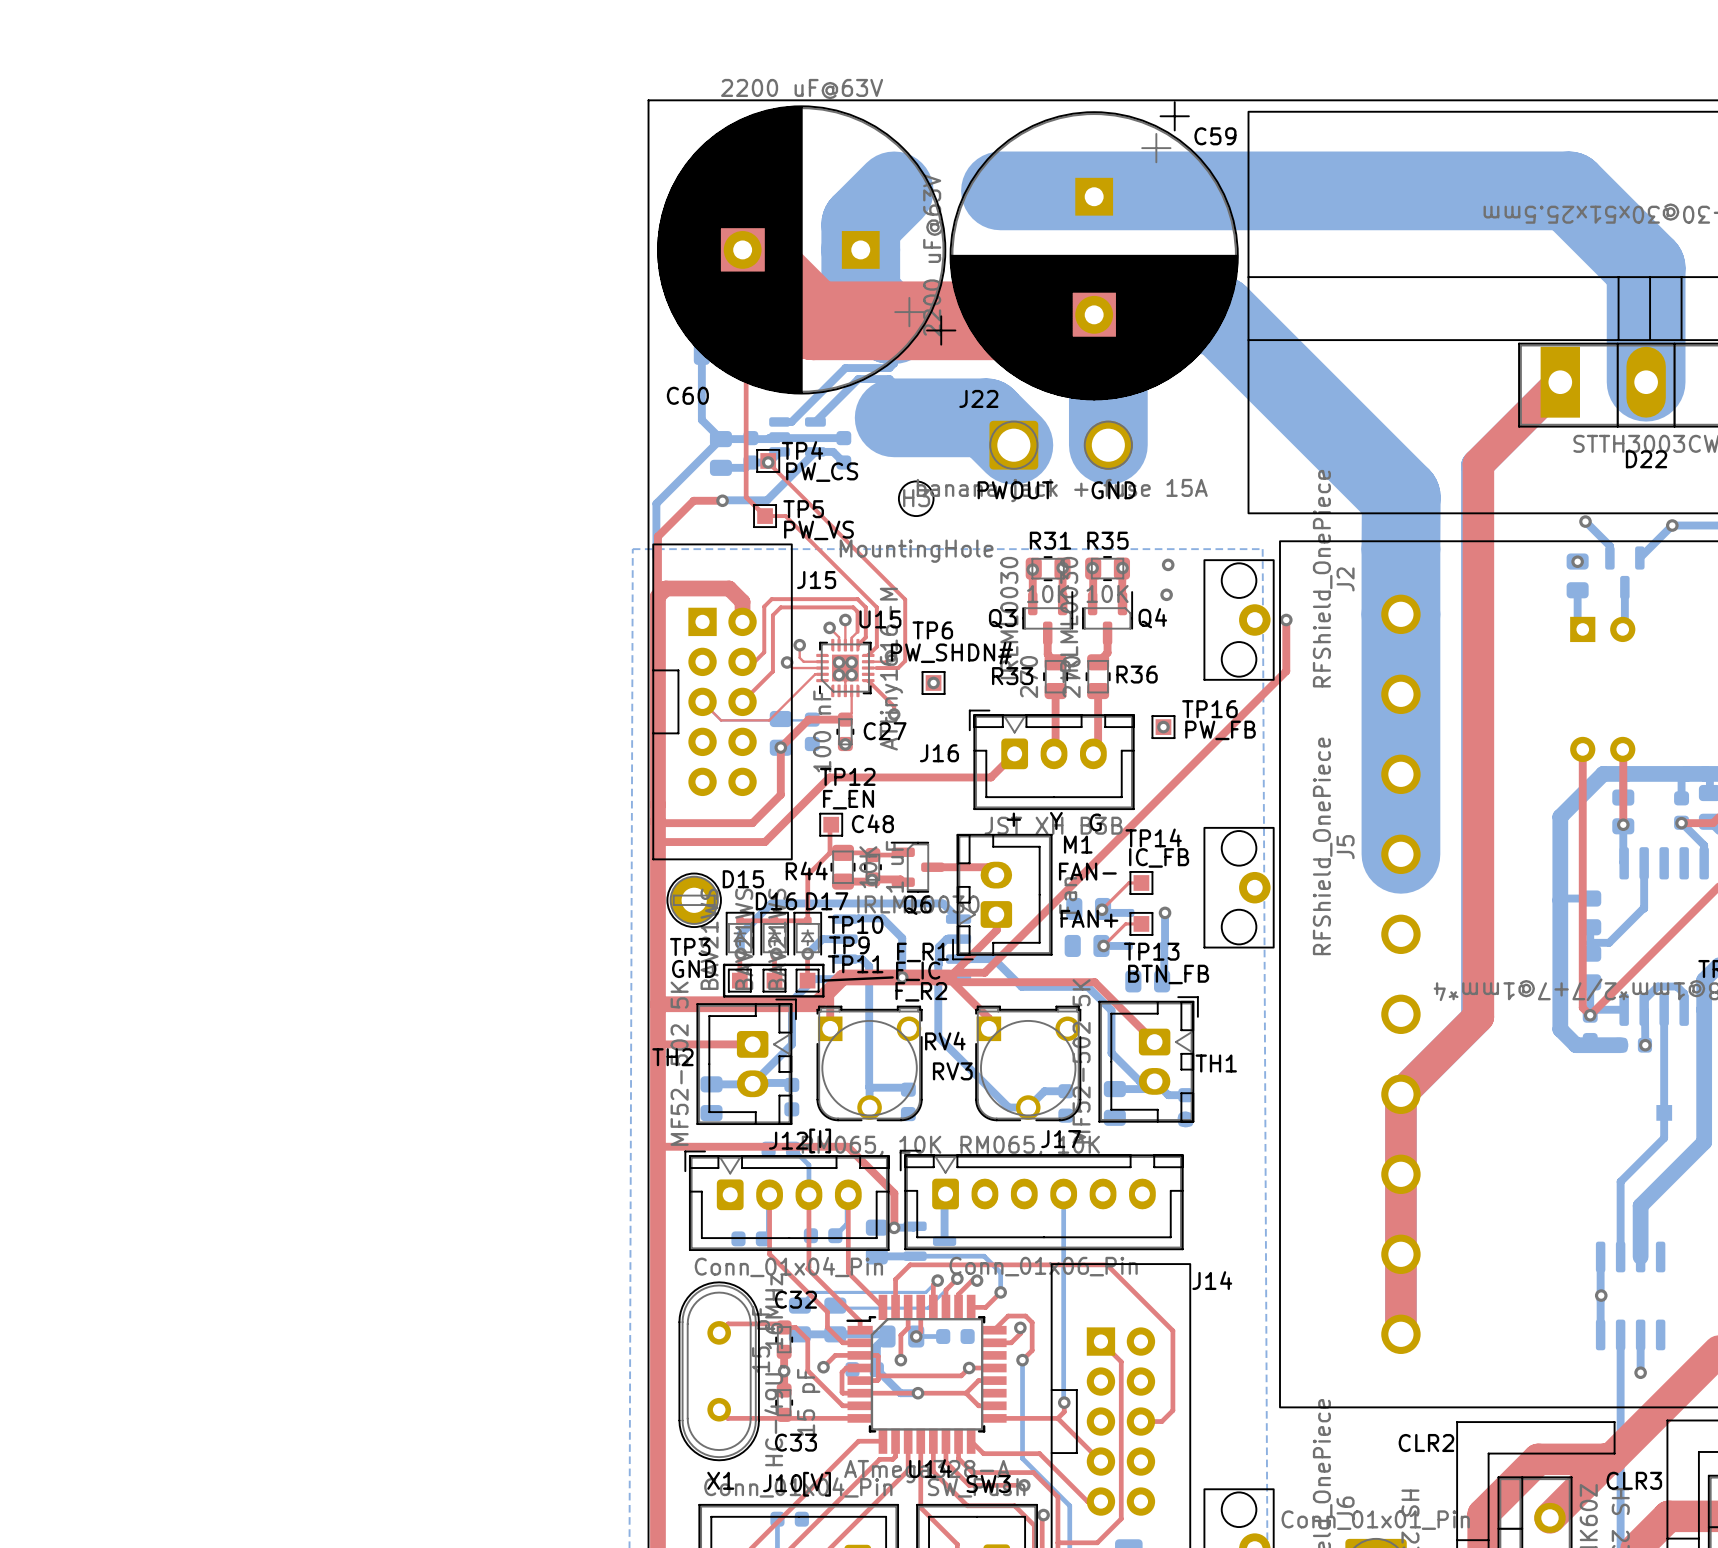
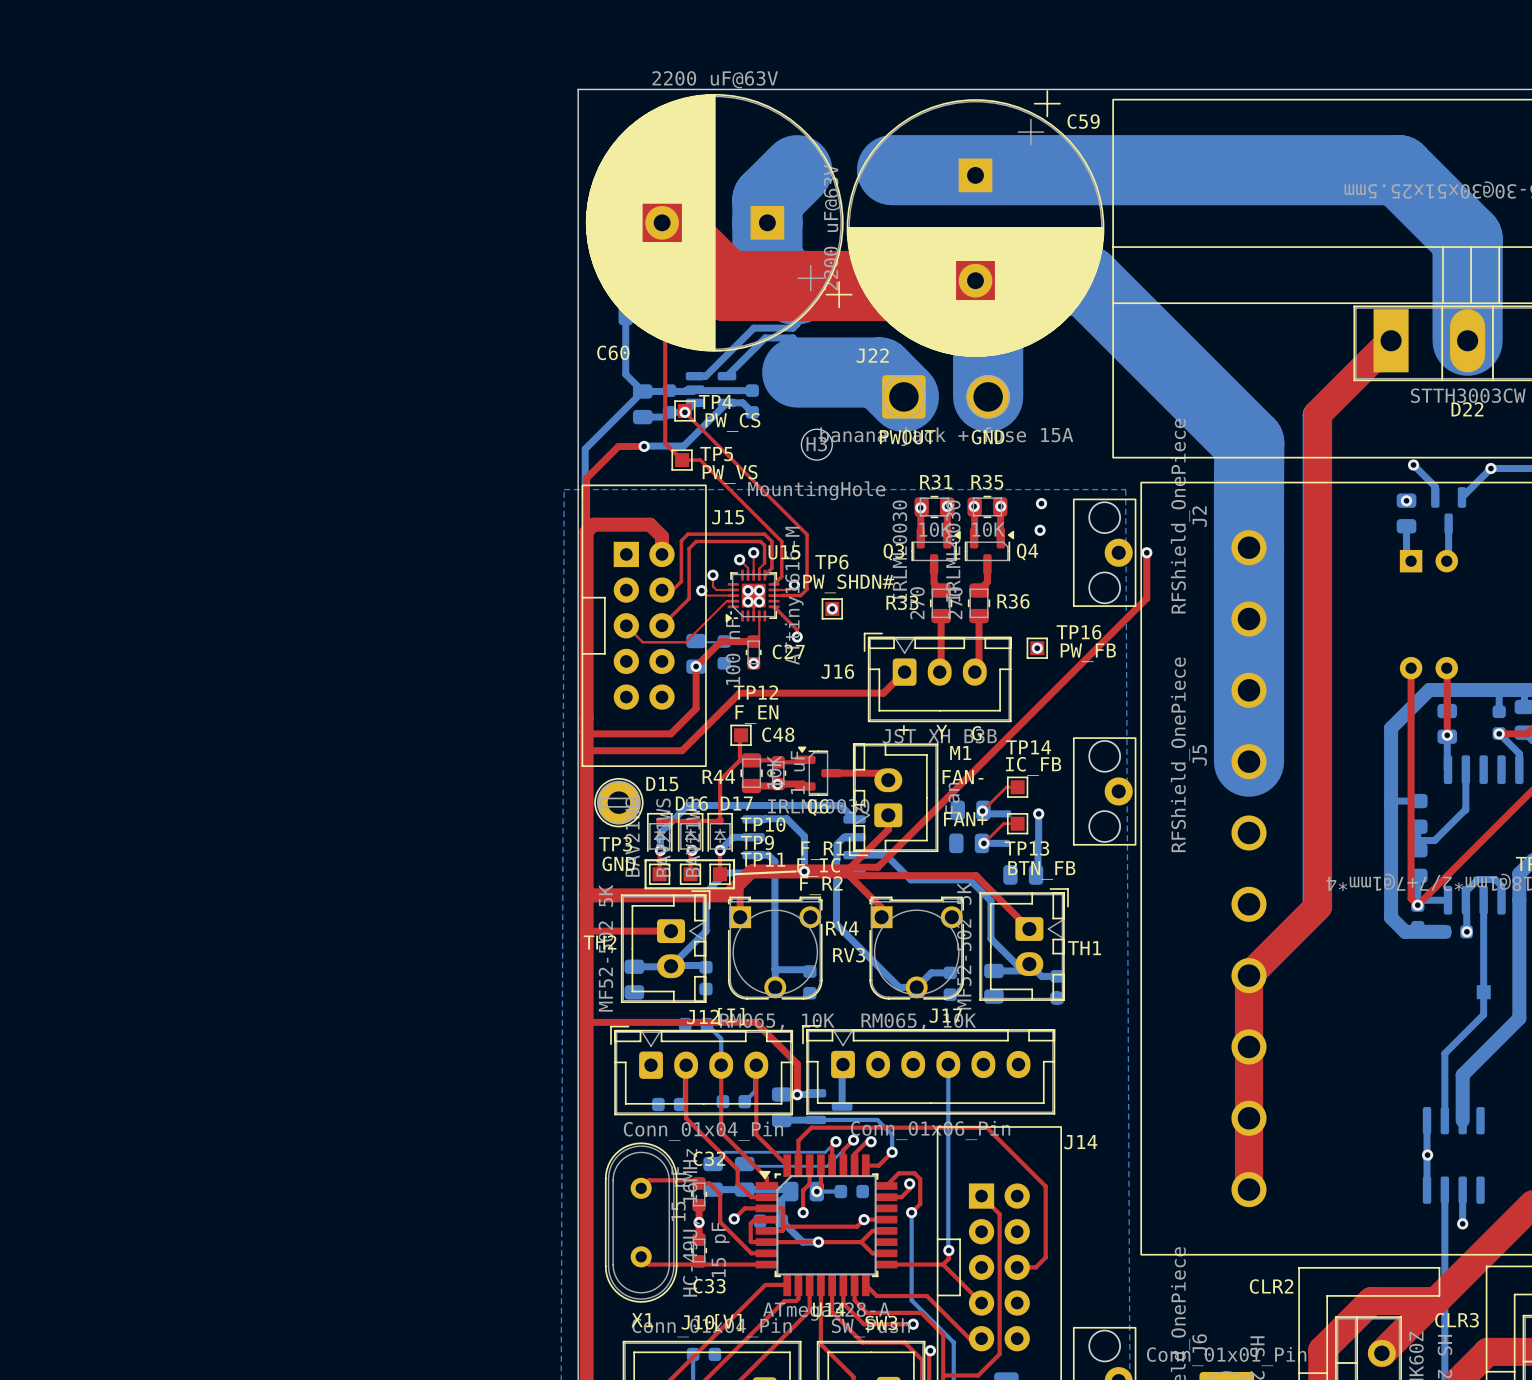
Q3 footprint: [1022, 591, 1074, 645] -> [911, 527, 961, 575]
Q4 footprint: [1082, 591, 1134, 645] -> [964, 527, 1015, 575]
U15 footprint: [816, 638, 875, 698] -> [725, 569, 780, 623]
Q6 footprint: [890, 841, 945, 893] -> [794, 746, 842, 796]
U14 footprint: [846, 1294, 1007, 1454] -> [755, 1154, 898, 1297]

